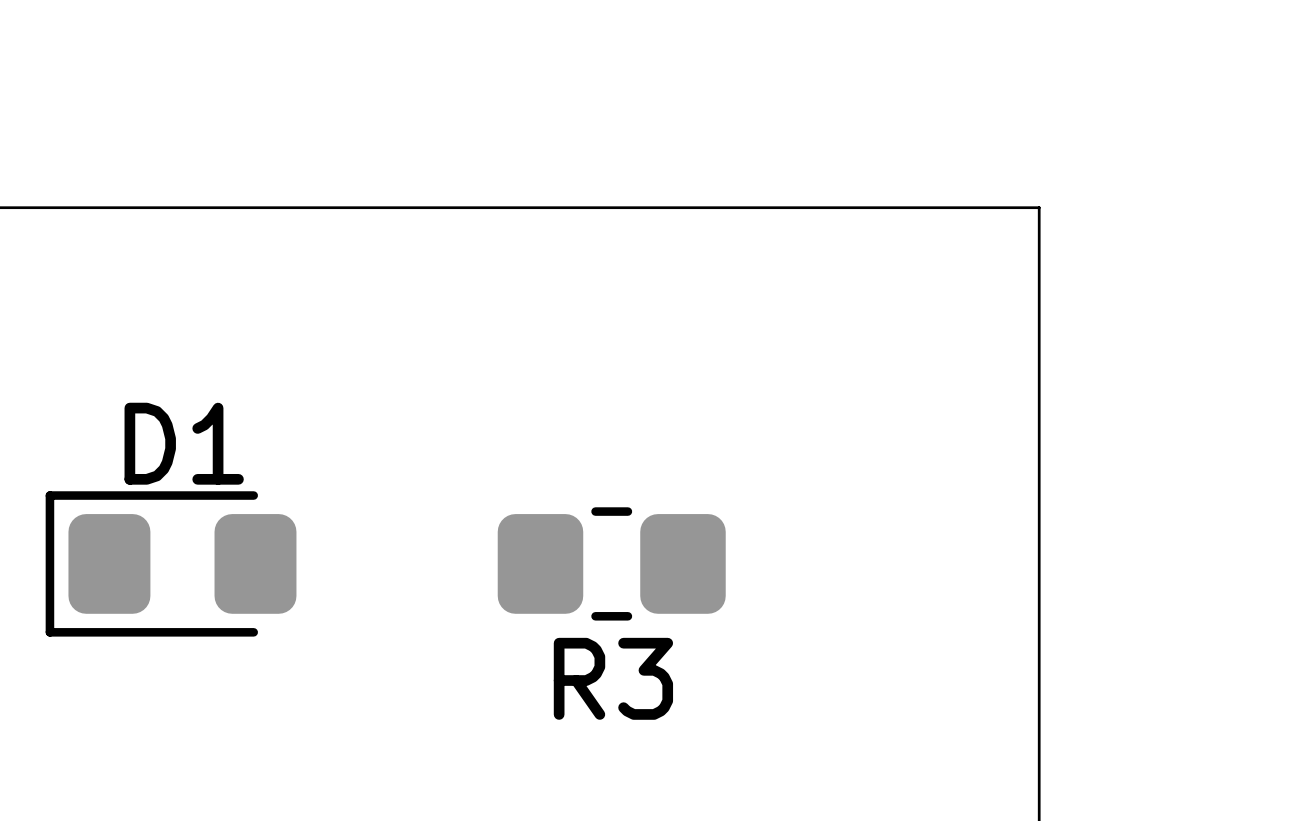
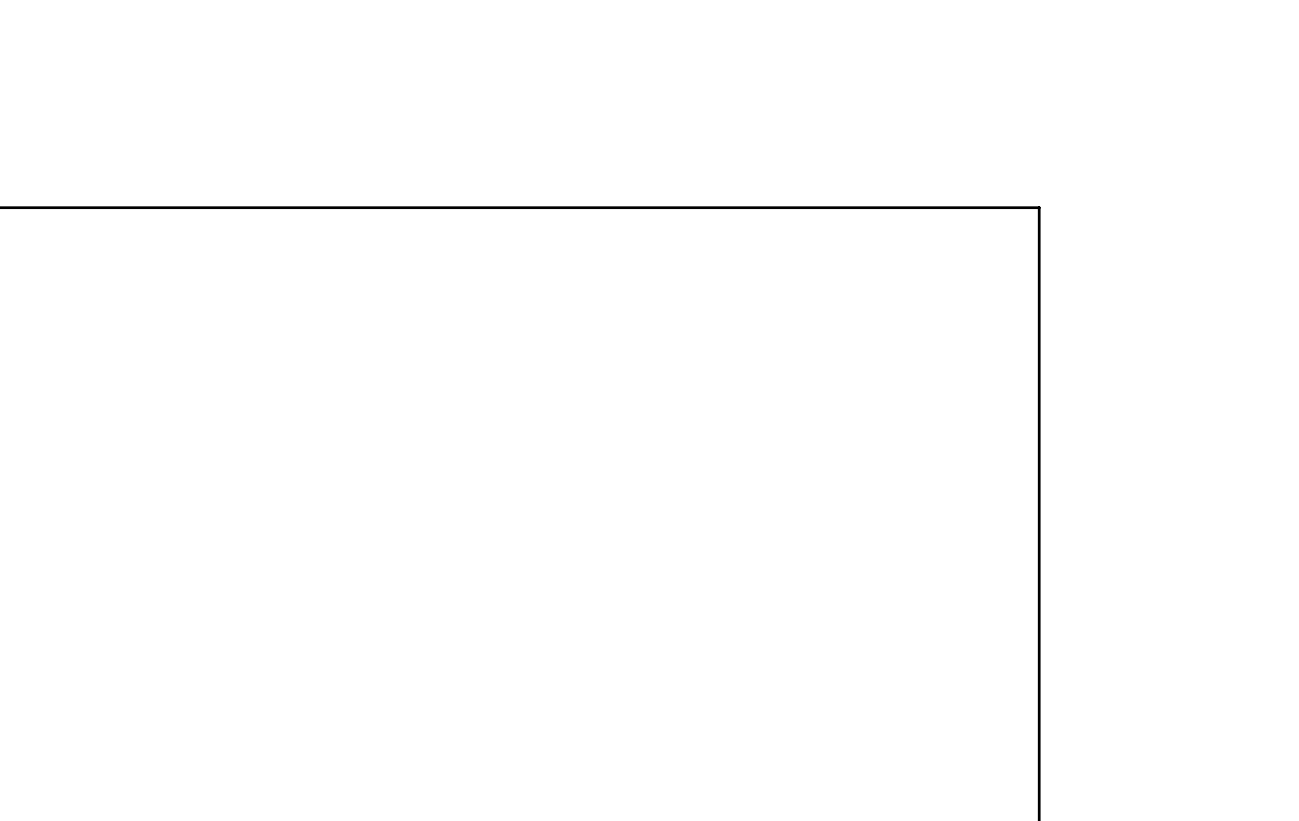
D1: (171, 563) -> none
R3: (611, 563) -> none

